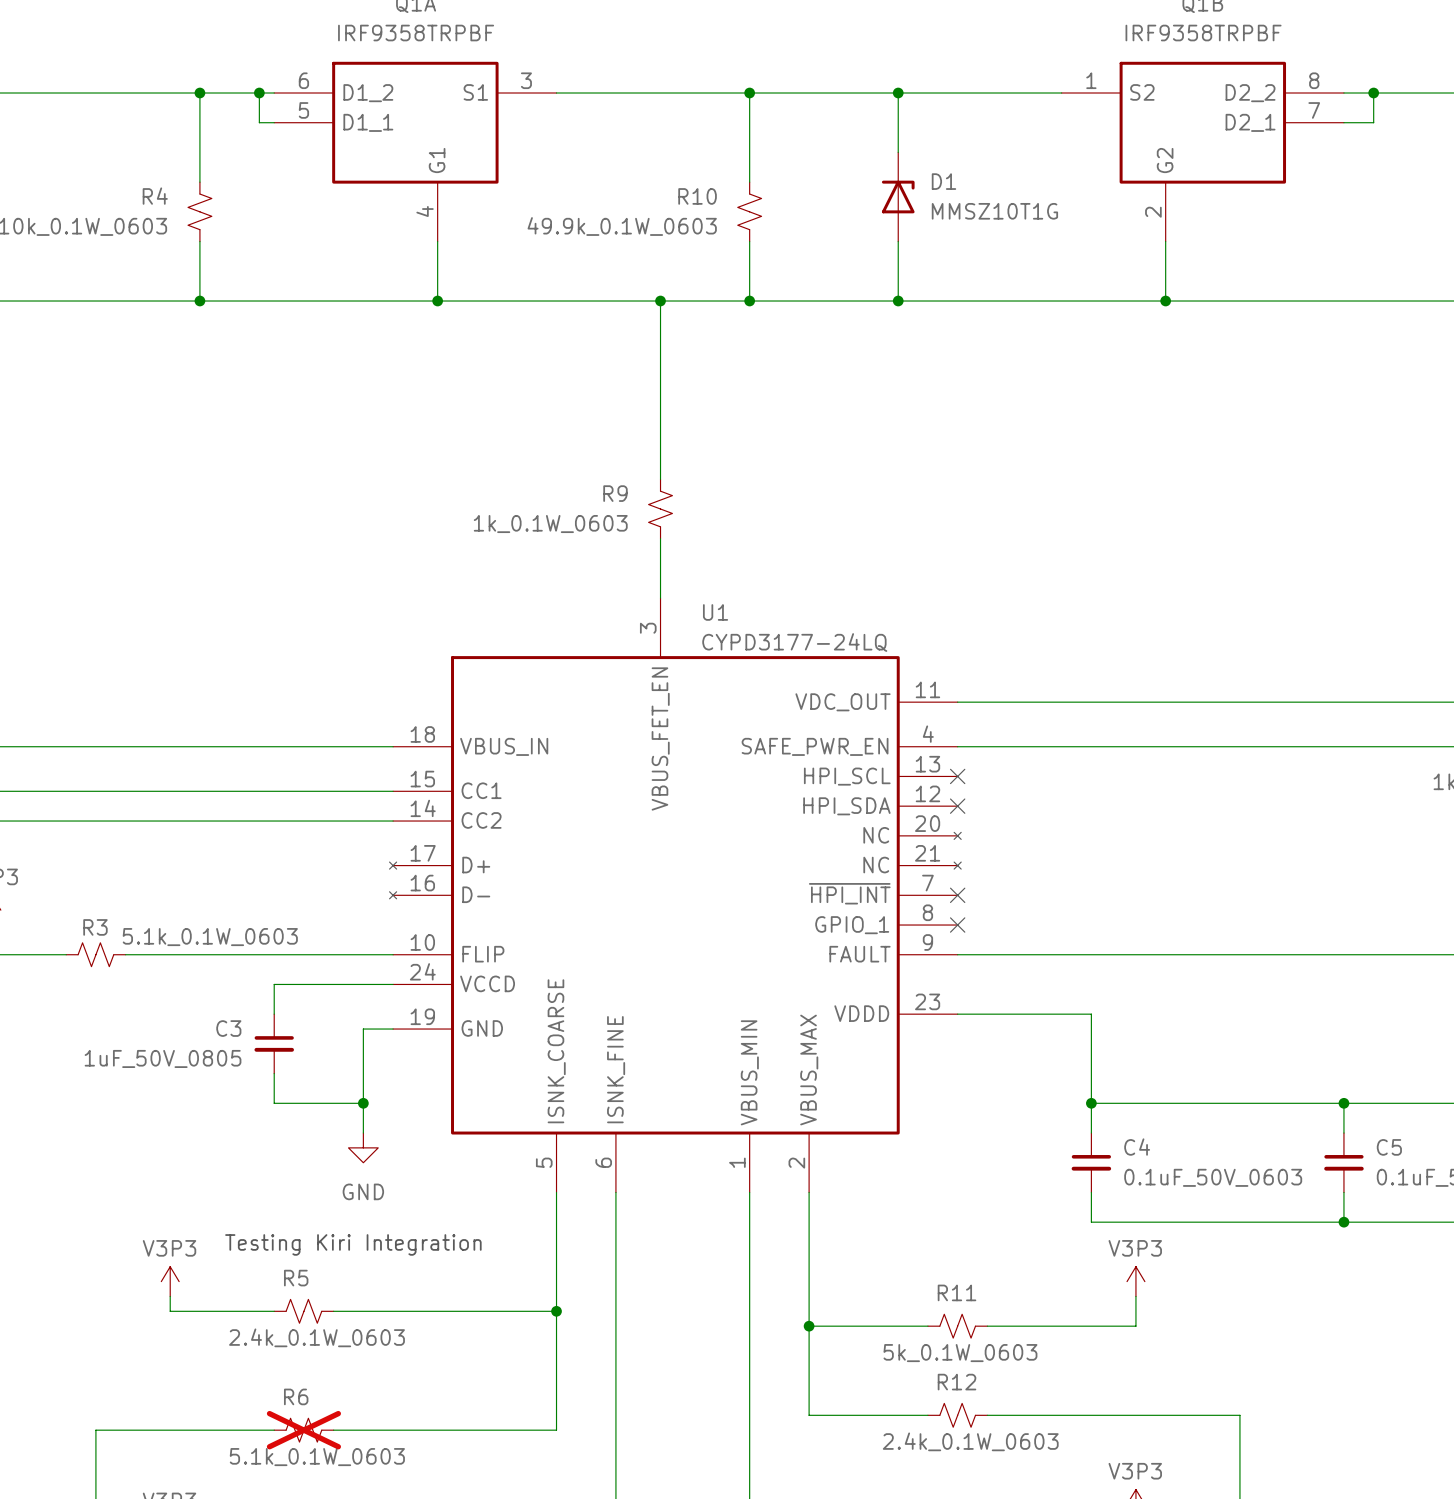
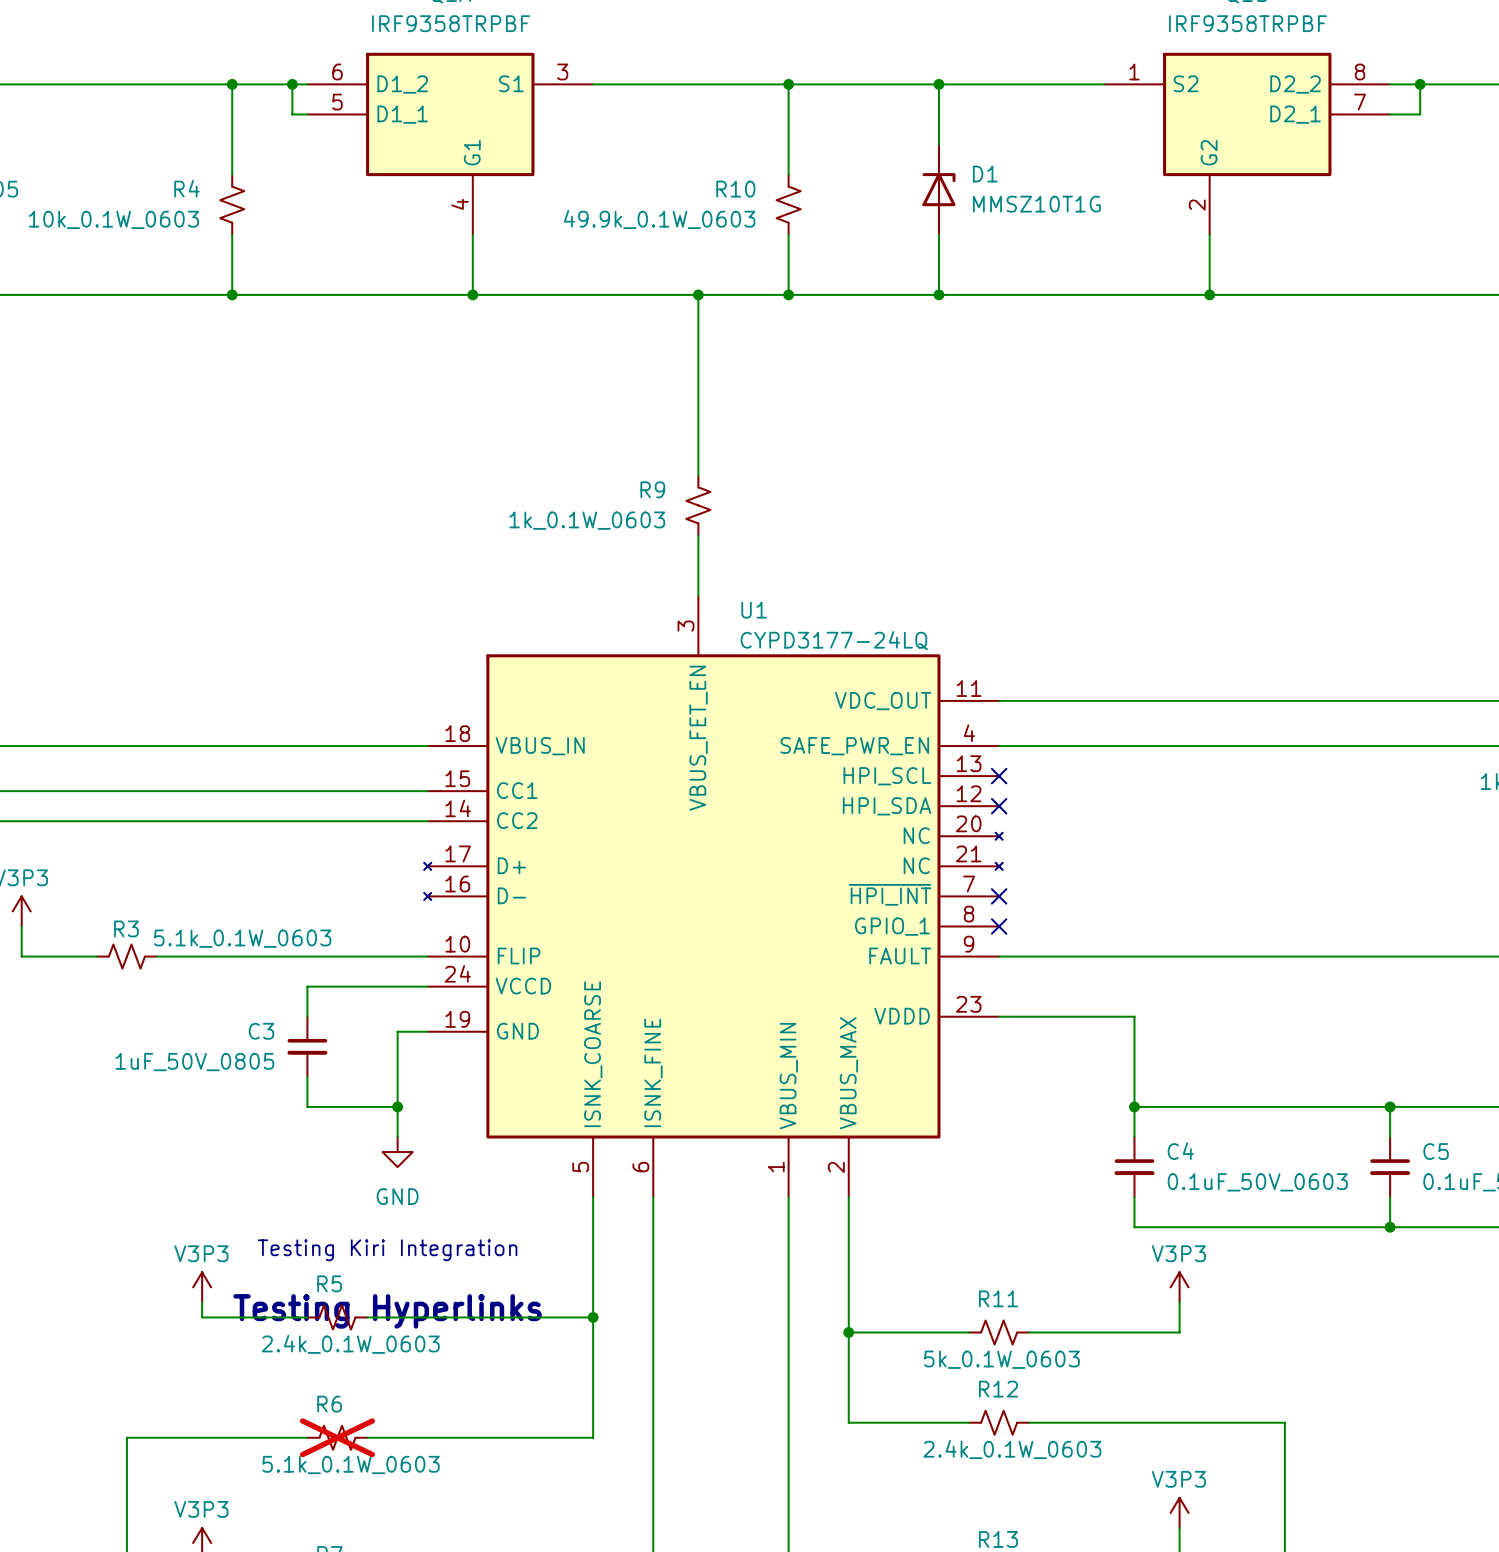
text: none -> Testing Hyperlinks (387, 1311)

